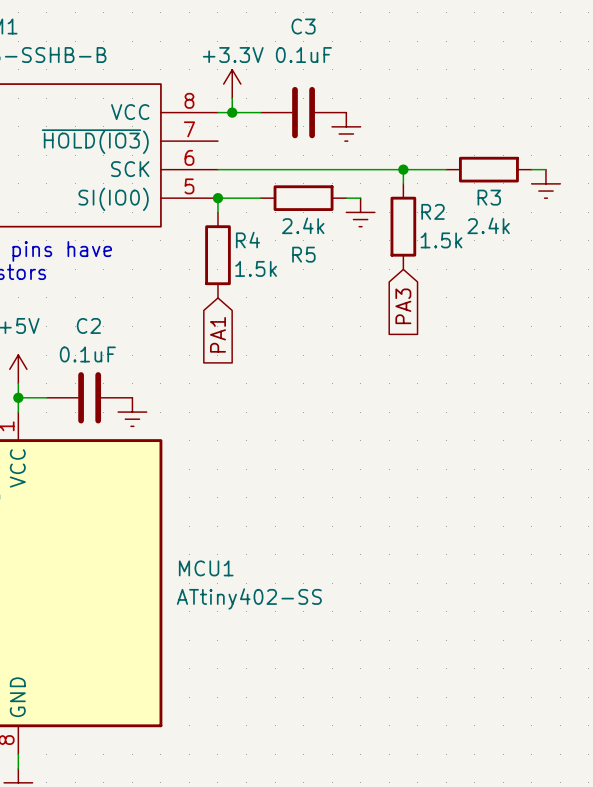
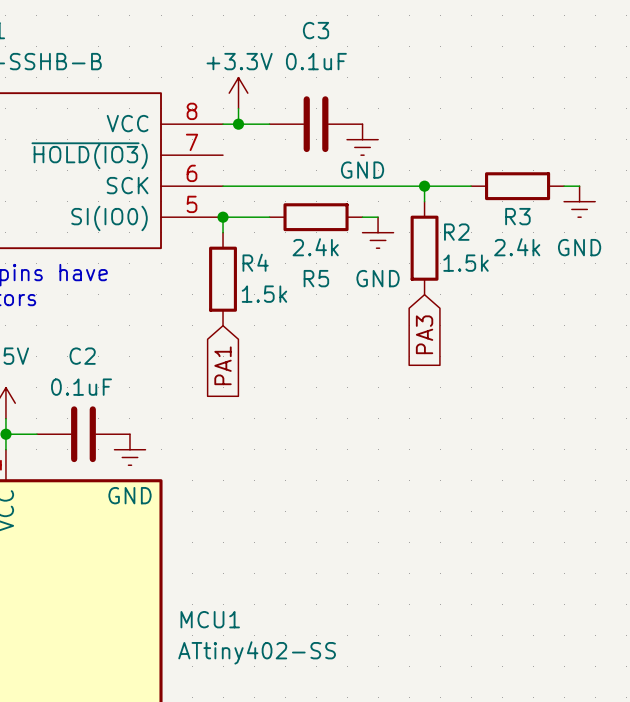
power symbol text: none -> GND (362, 170)
power symbol text: none -> GND (579, 247)
power symbol text: none -> GND (378, 278)
power symbol text: none -> GND (129, 495)

